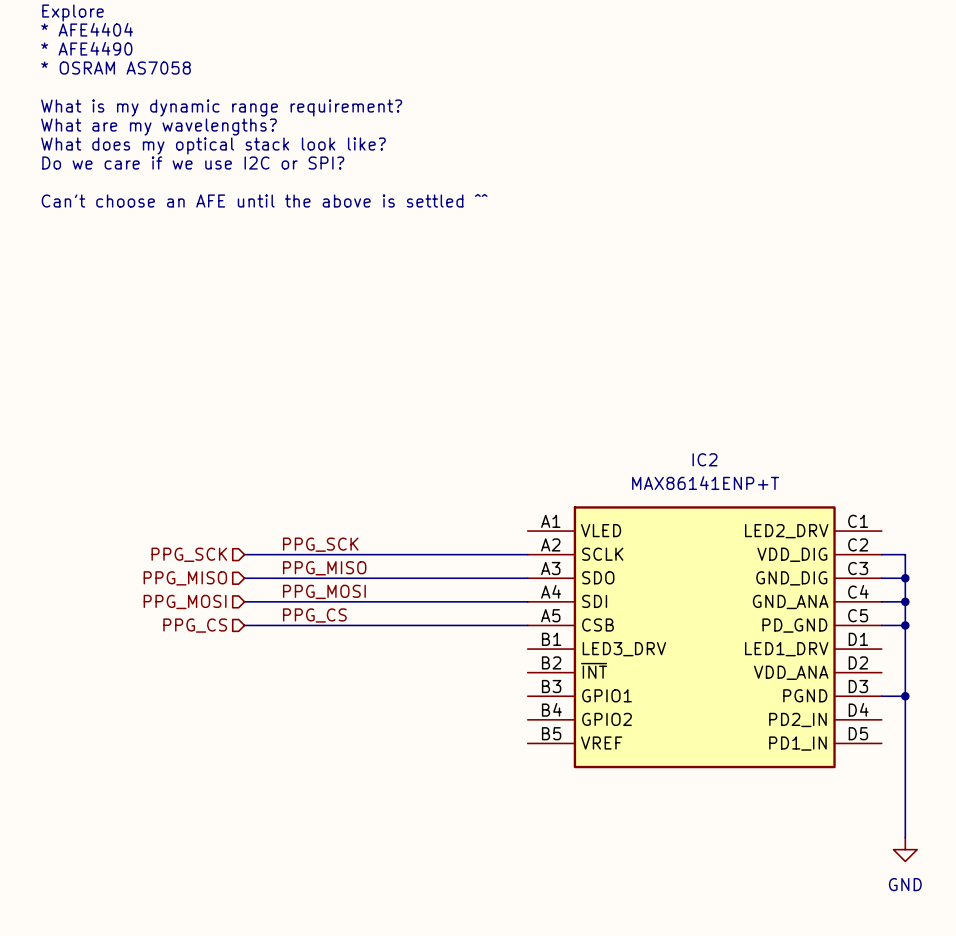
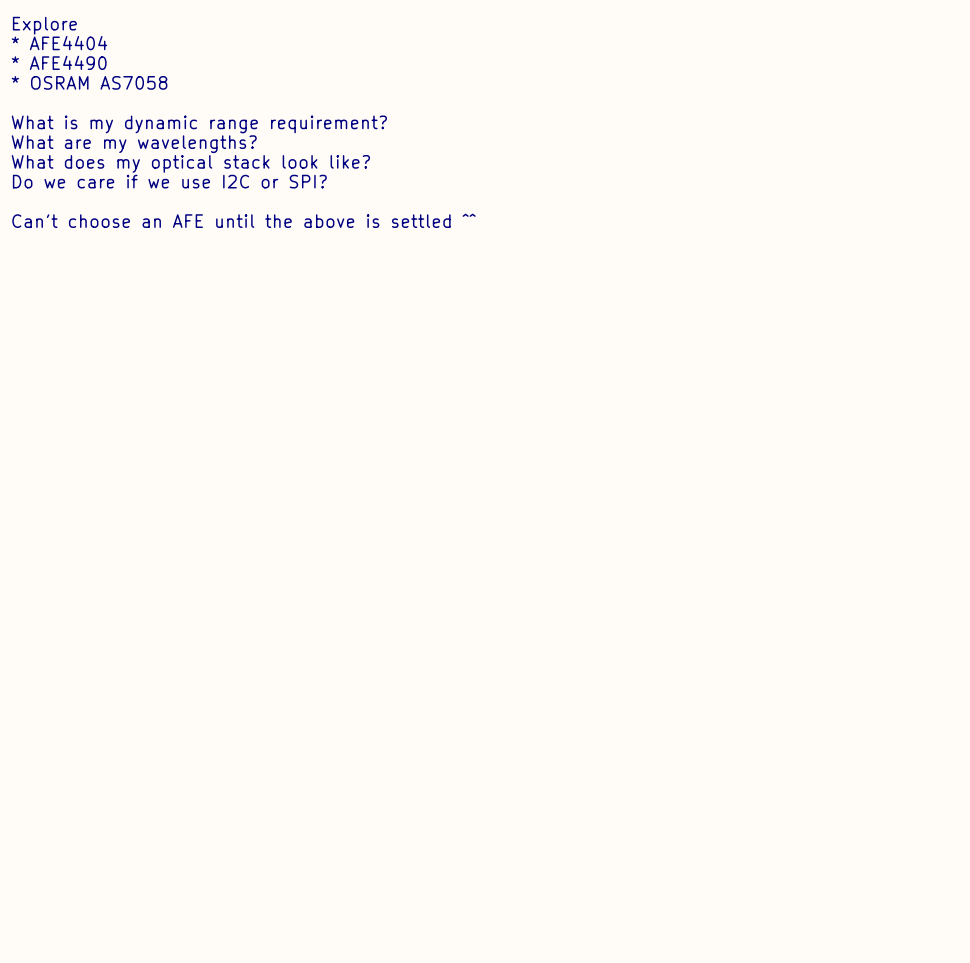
label: PPG_SCK (320, 544) -> none
hierarchical label: PPG_SCK (189, 554) -> none
wire: (244, 554) (527, 554) -> none
wire: (881, 554) (905, 554) (905, 837) -> none
label: PPG_MISO (324, 568) -> none
hierarchical label: PPG_MISO (185, 578) -> none
wire: (244, 578) (527, 578) -> none
wire: (881, 578) (905, 578) -> none
junction: (905, 578) -> none
label: PPG_MOSI (324, 591) -> none
hierarchical label: PPG_MOSI (185, 601) -> none
wire: (244, 601) (527, 601) -> none
wire: (881, 601) (905, 601) -> none
junction: (905, 601) -> none
label: PPG_CS (314, 615) -> none
hierarchical label: PPG_CS (195, 625) -> none
wire: (244, 625) (527, 625) -> none
wire: (881, 625) (905, 625) -> none
junction: (905, 625) -> none
IC2: MAX86141ENP+T (704, 637) -> none
wire: (881, 696) (905, 696) -> none
junction: (905, 696) -> none
power symbol: GND (905, 849) -> none

